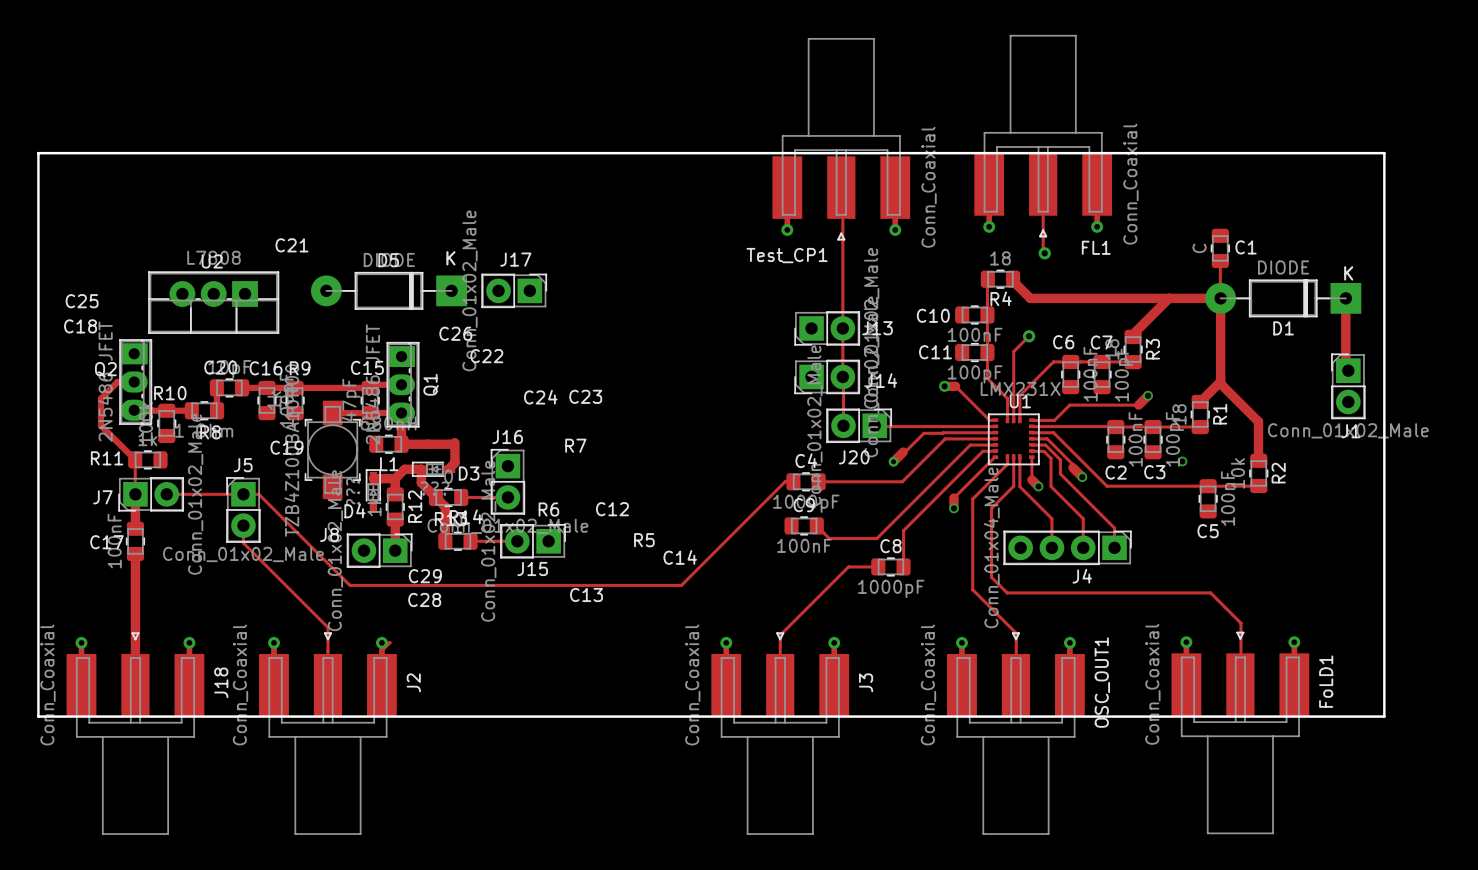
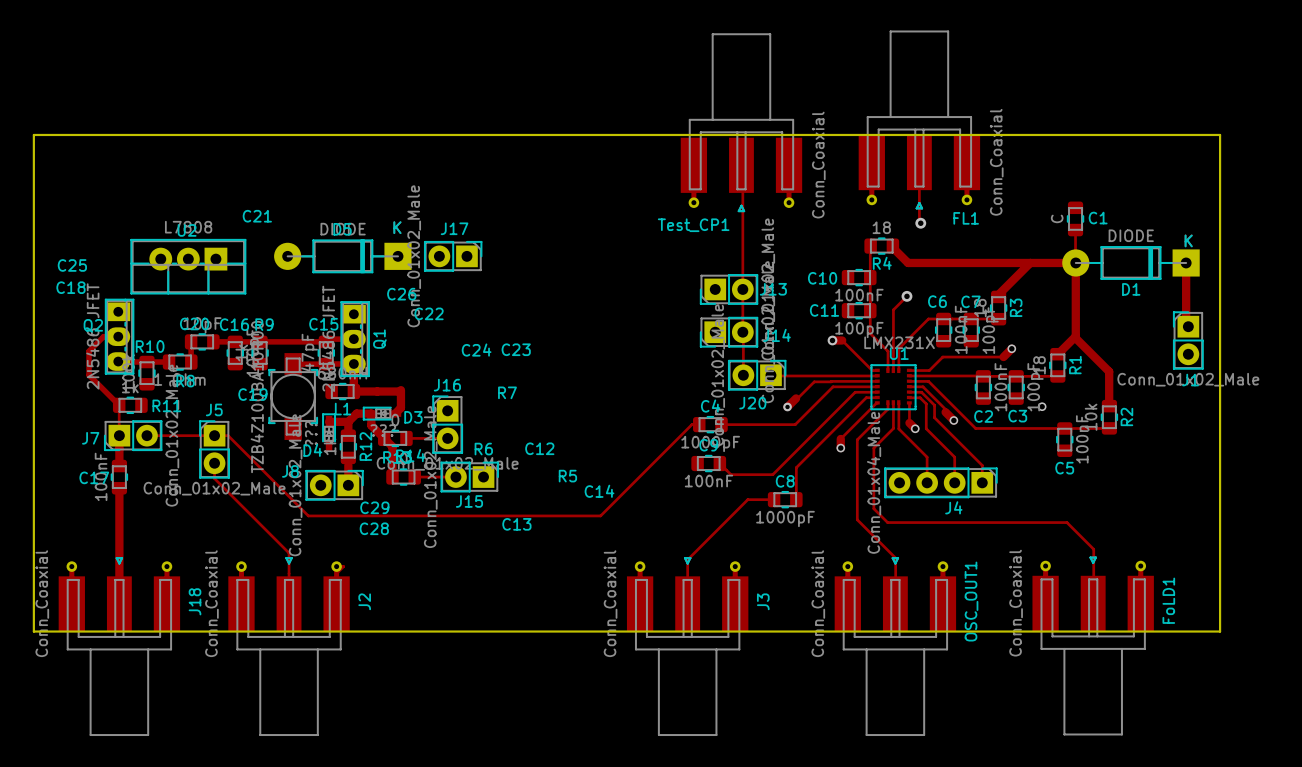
R11 name position: R11 (107, 458) -> R11 (166, 405)

